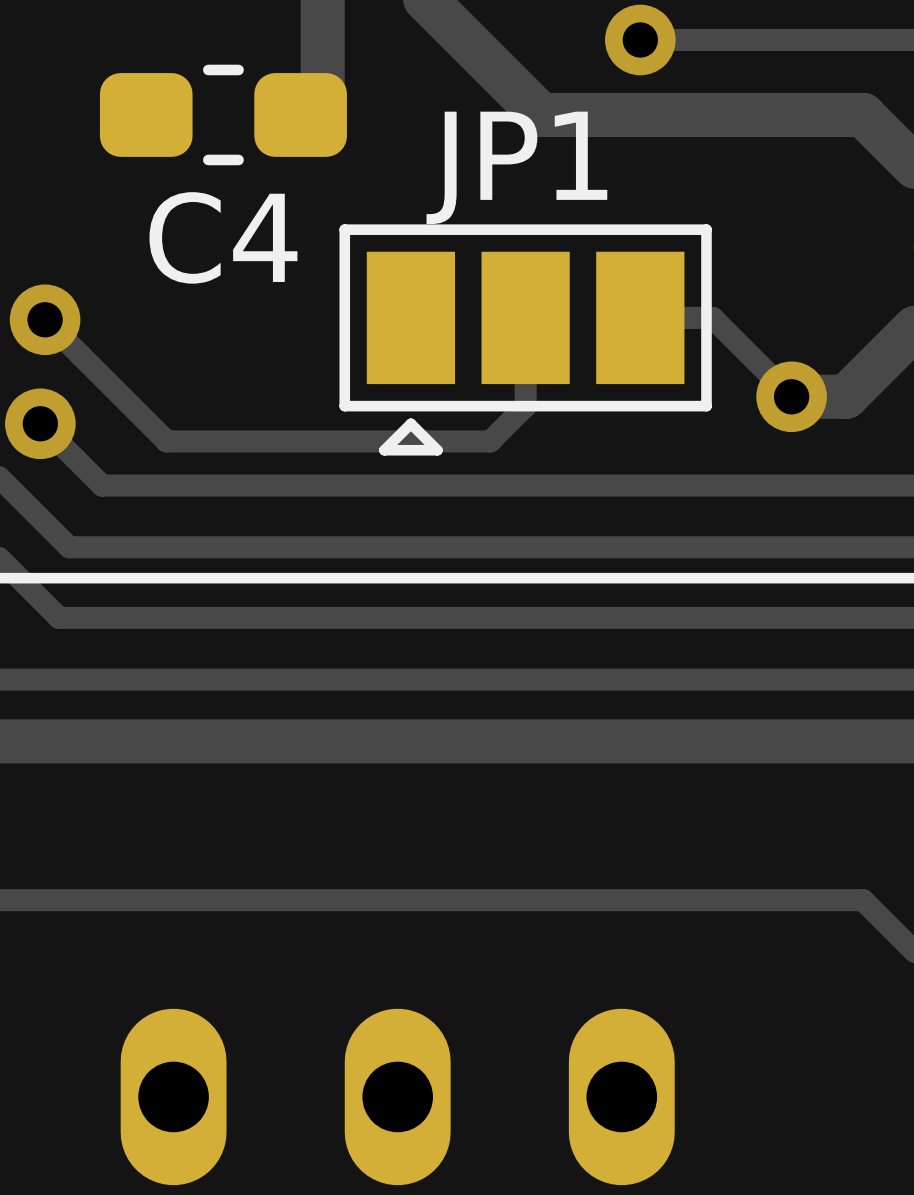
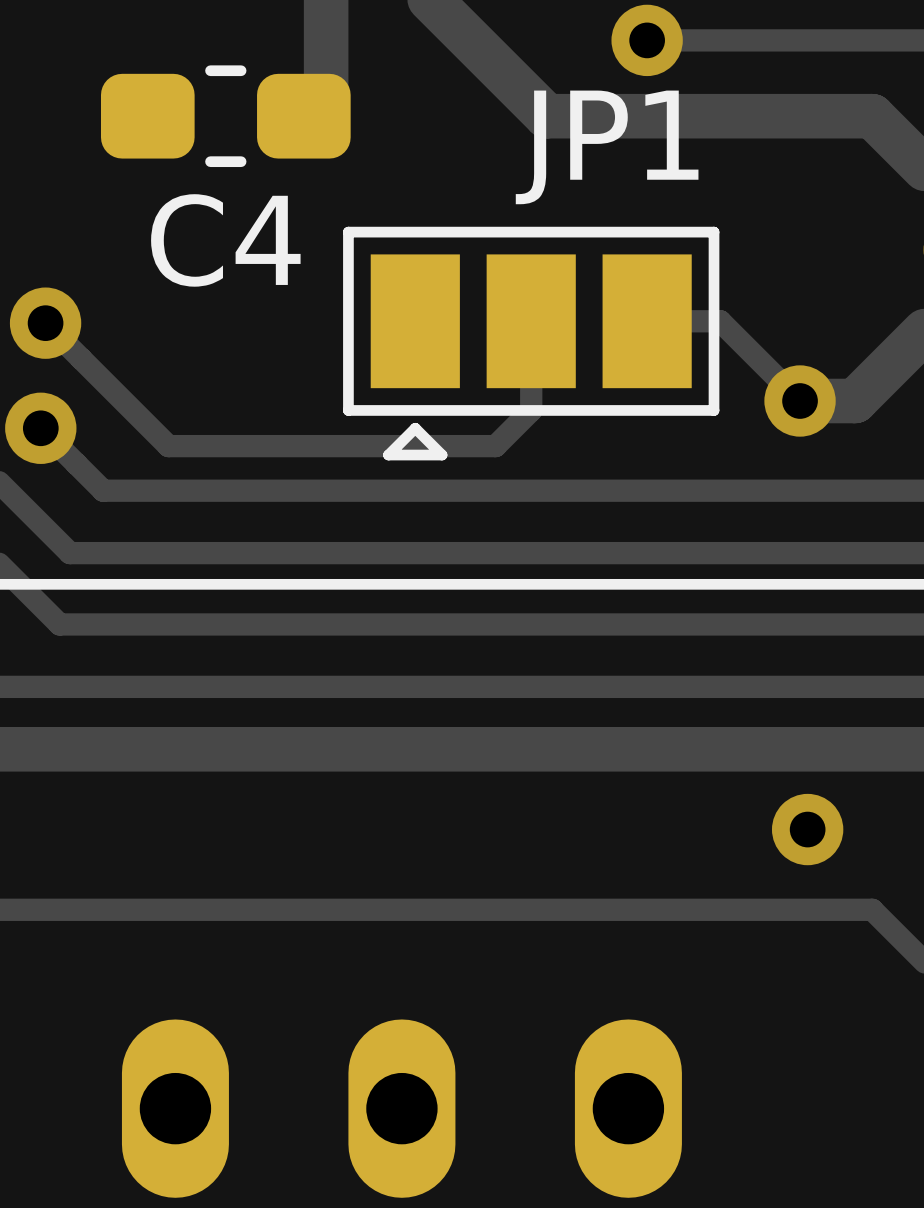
JP1 name position: JP1 (516, 167) -> JP1 (607, 147)
via: none -> (807, 829)

